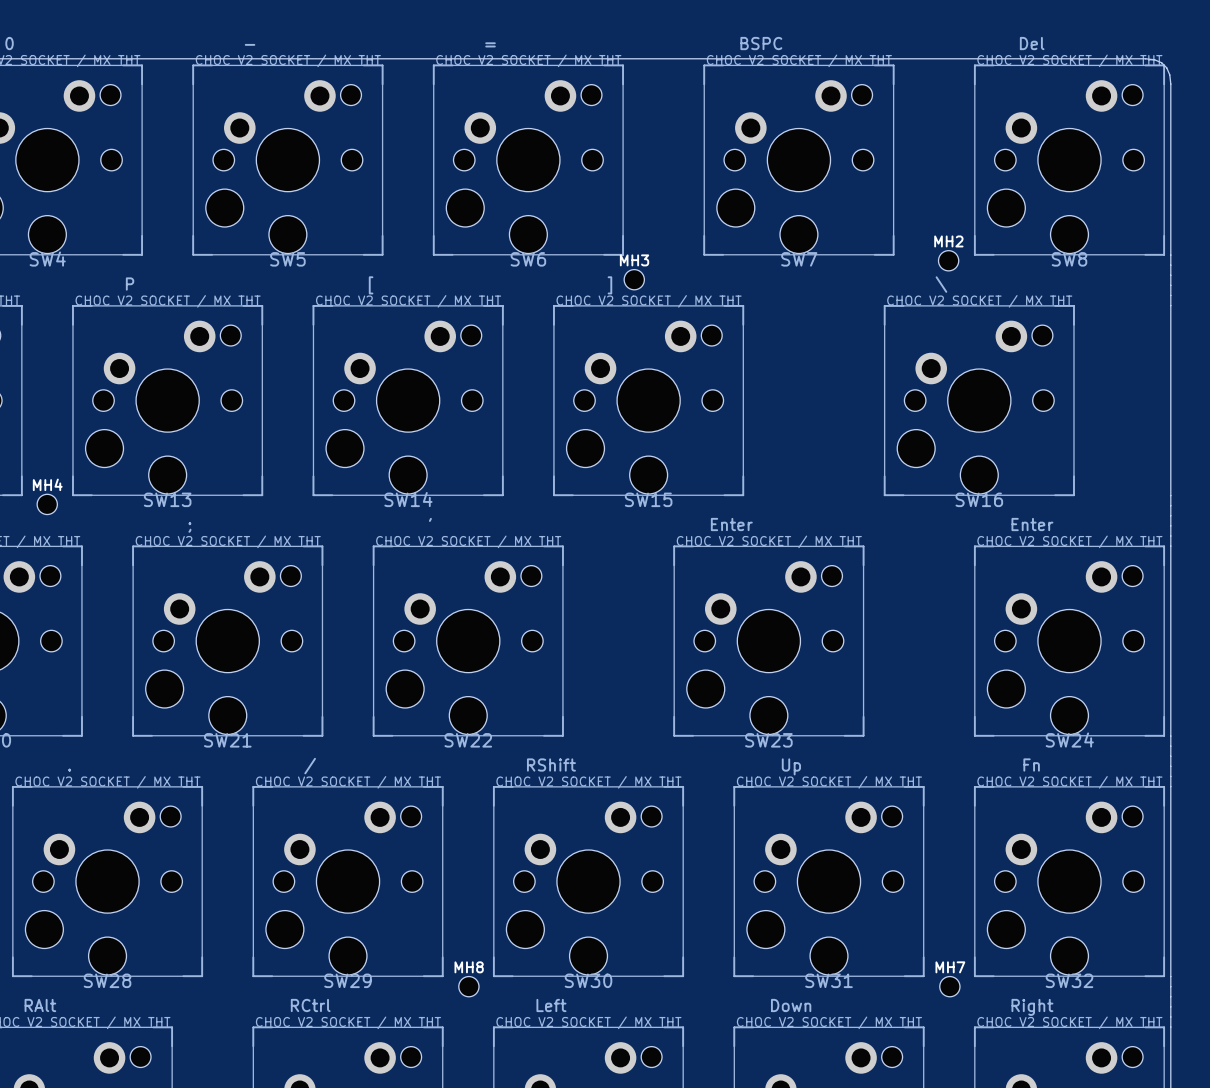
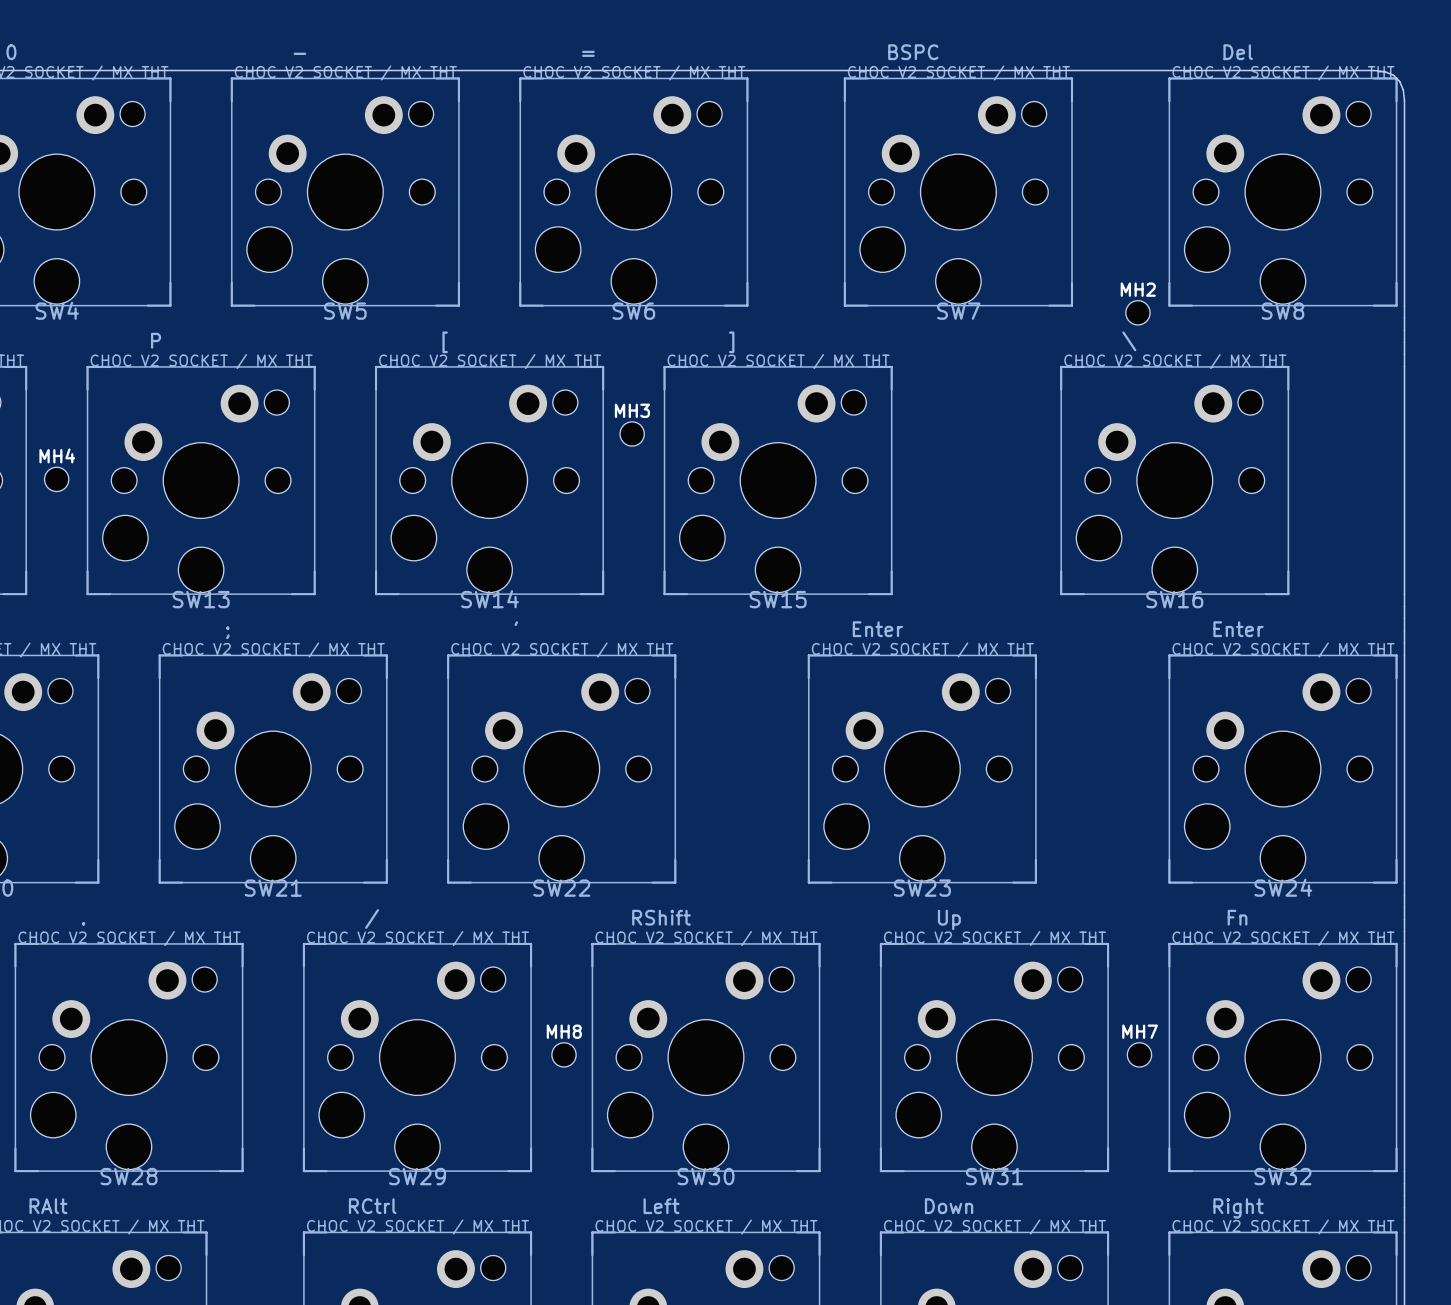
MH3 position: (634, 279) -> (632, 433)
MH4 position: (47, 504) -> (56, 479)
MH8 position: (468, 986) -> (564, 1054)
MH7 position: (949, 986) -> (1139, 1054)

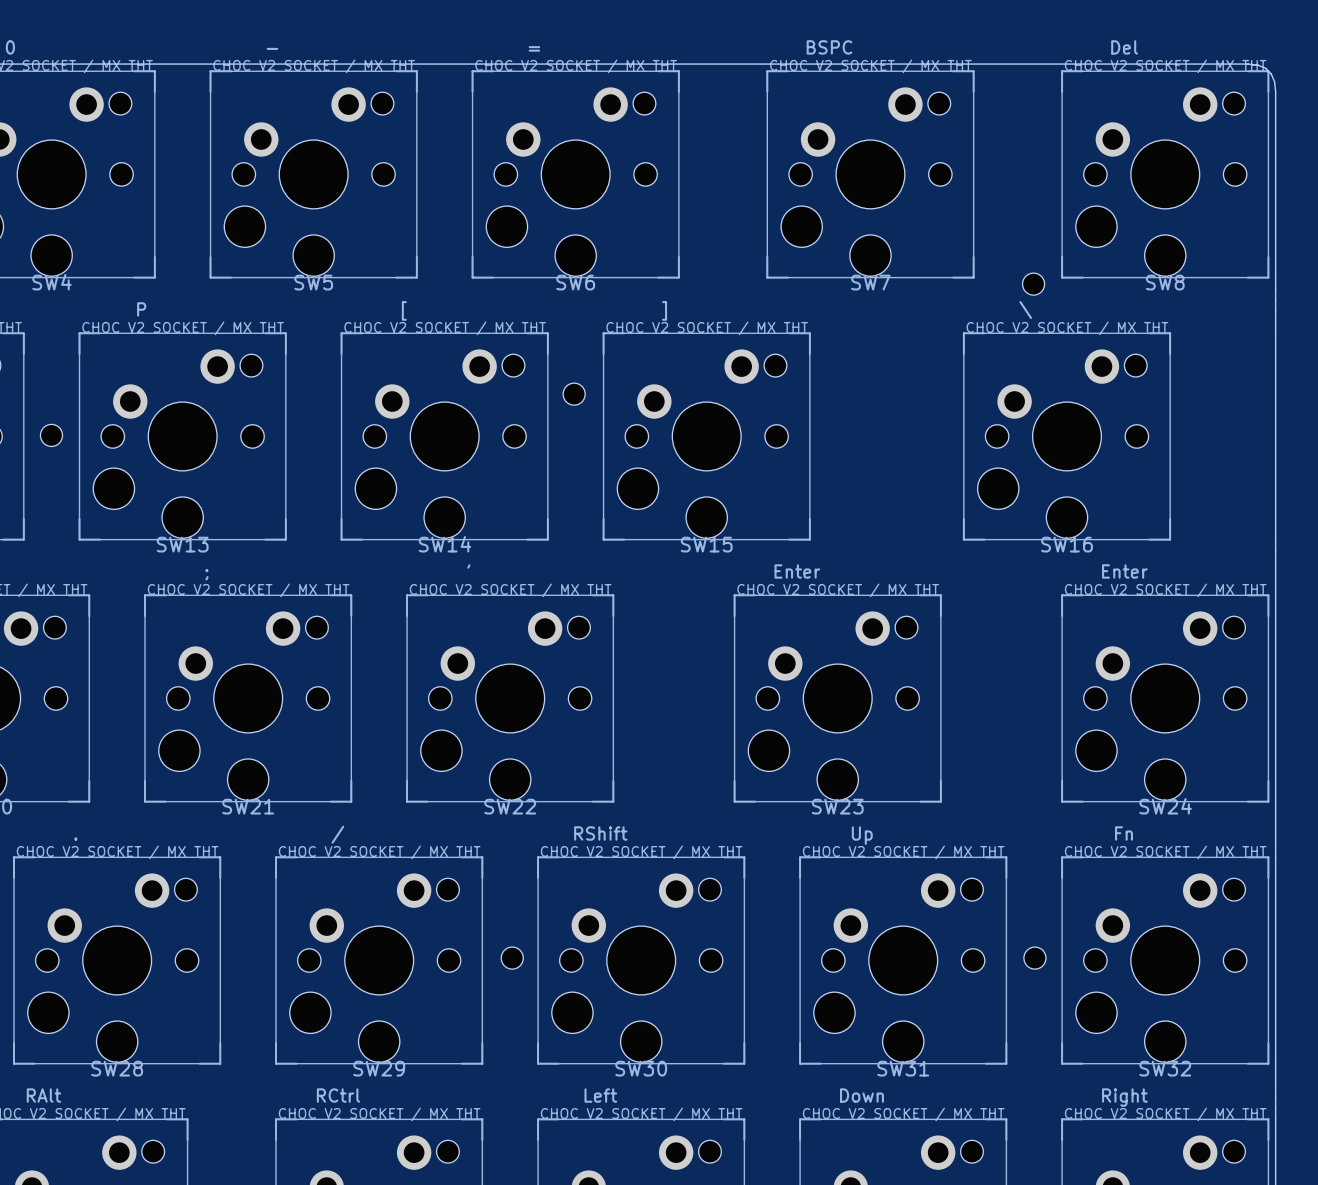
MH2 name: MH2 (1138, 289) -> none
MH3 name: MH3 (632, 410) -> none
MH4 name: MH4 (57, 455) -> none
MH8 name: MH8 (564, 1031) -> none
MH7 name: MH7 (1140, 1031) -> none

